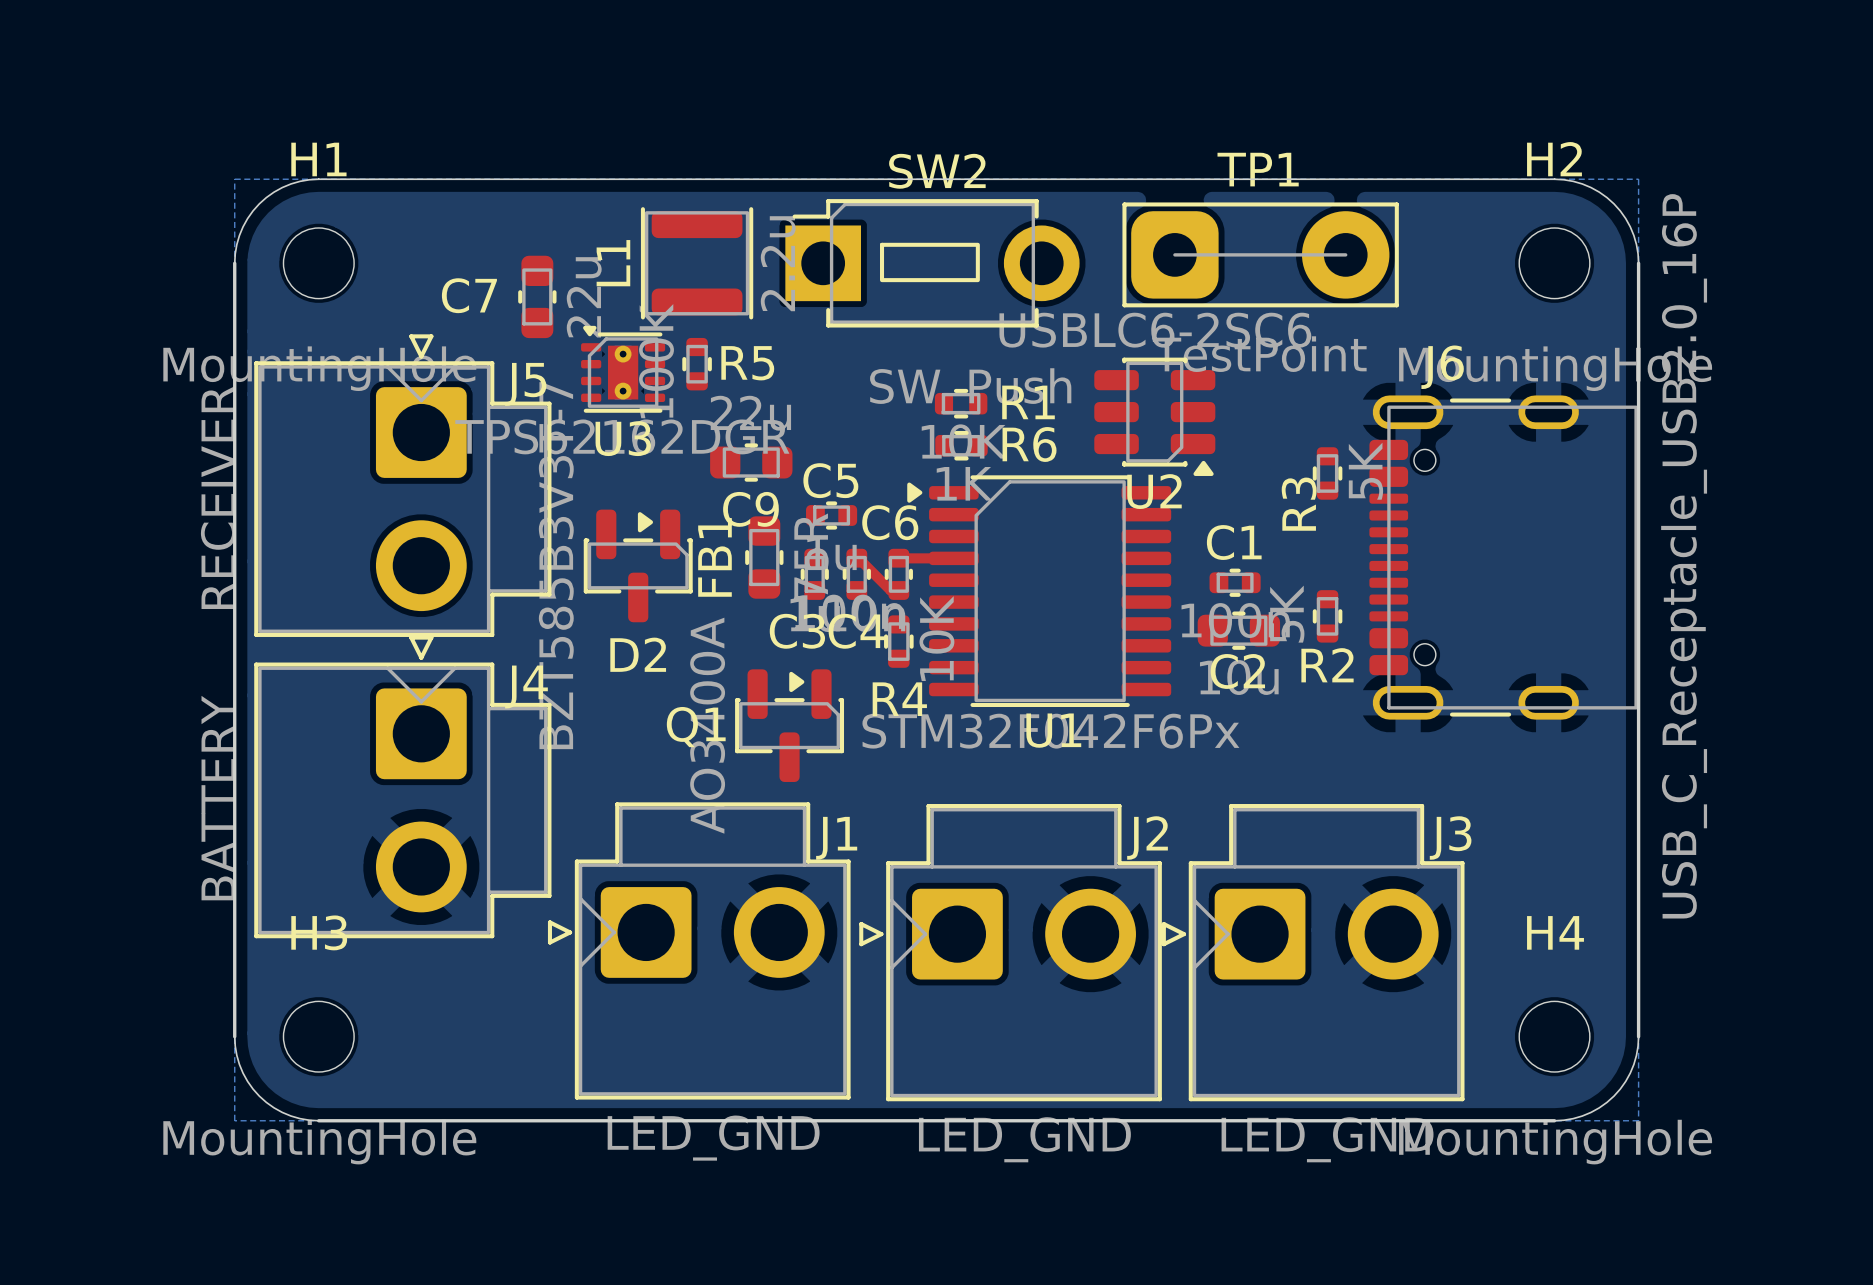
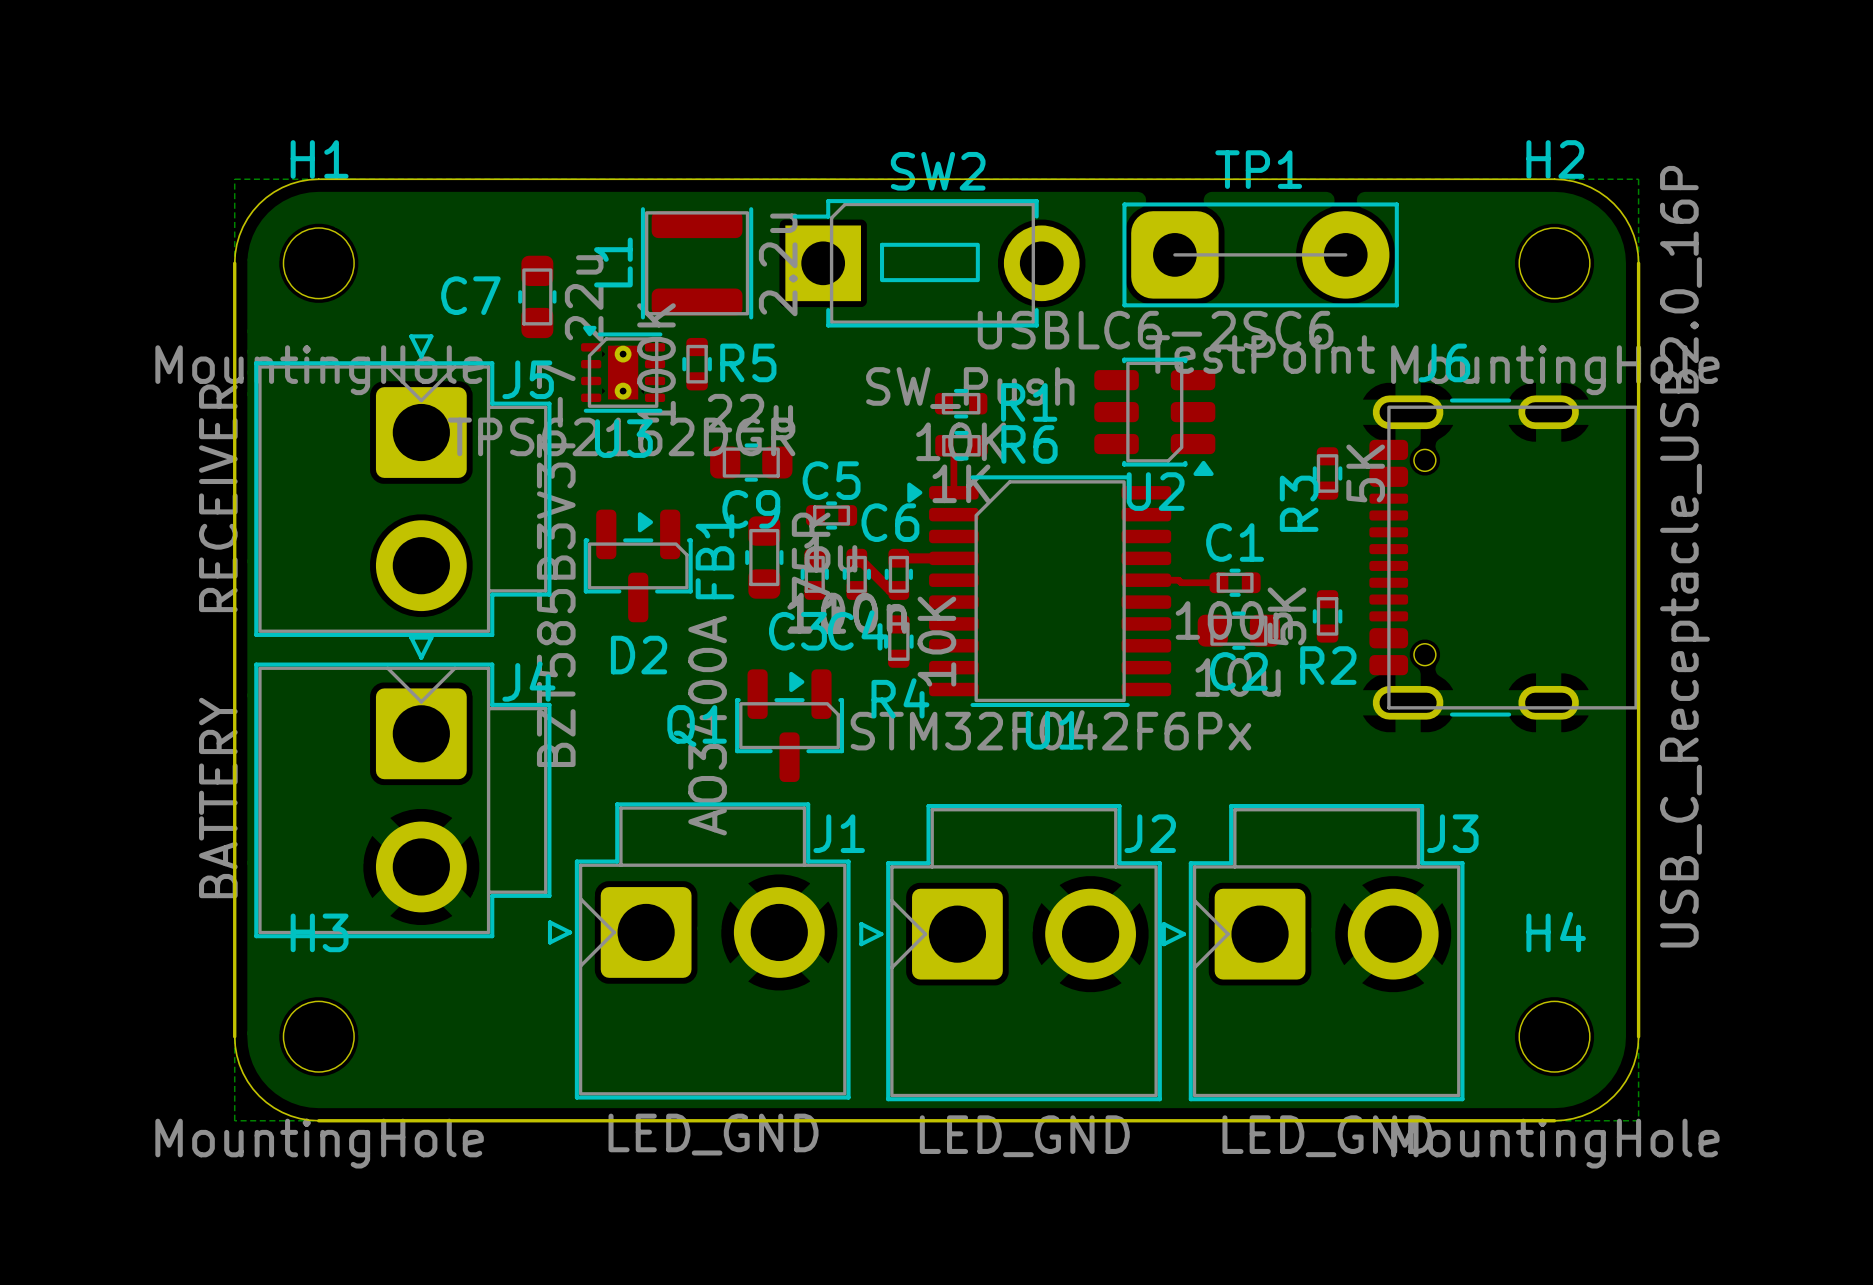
top track: none -> (944, 445) (953, 455) (953, 492)
top track: none -> (1146, 580) (1218, 582)

